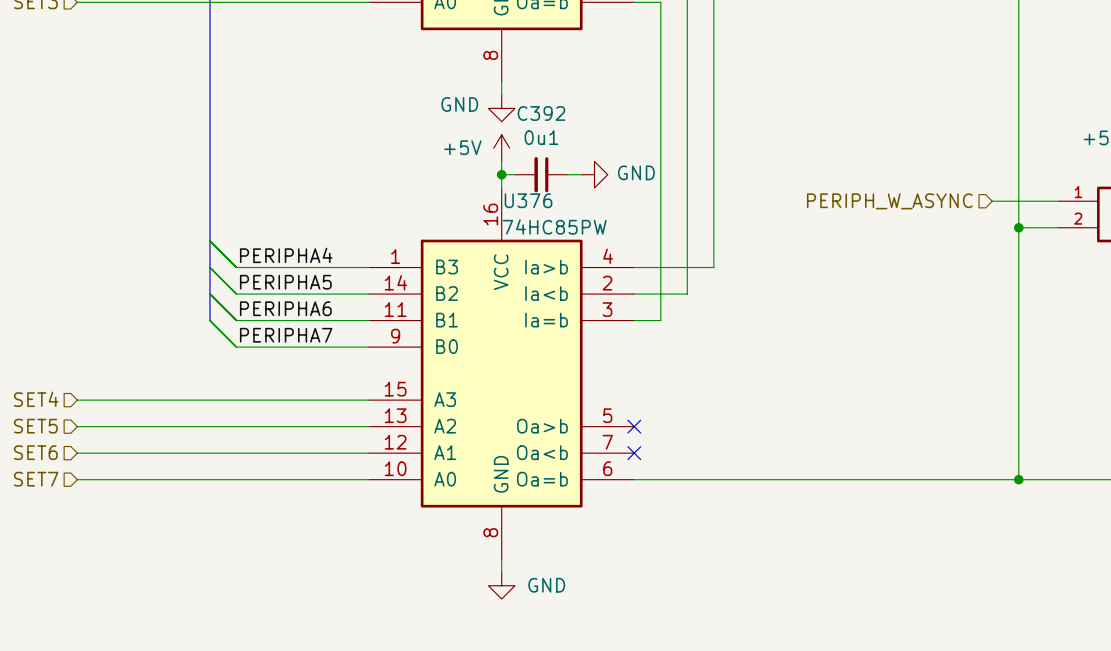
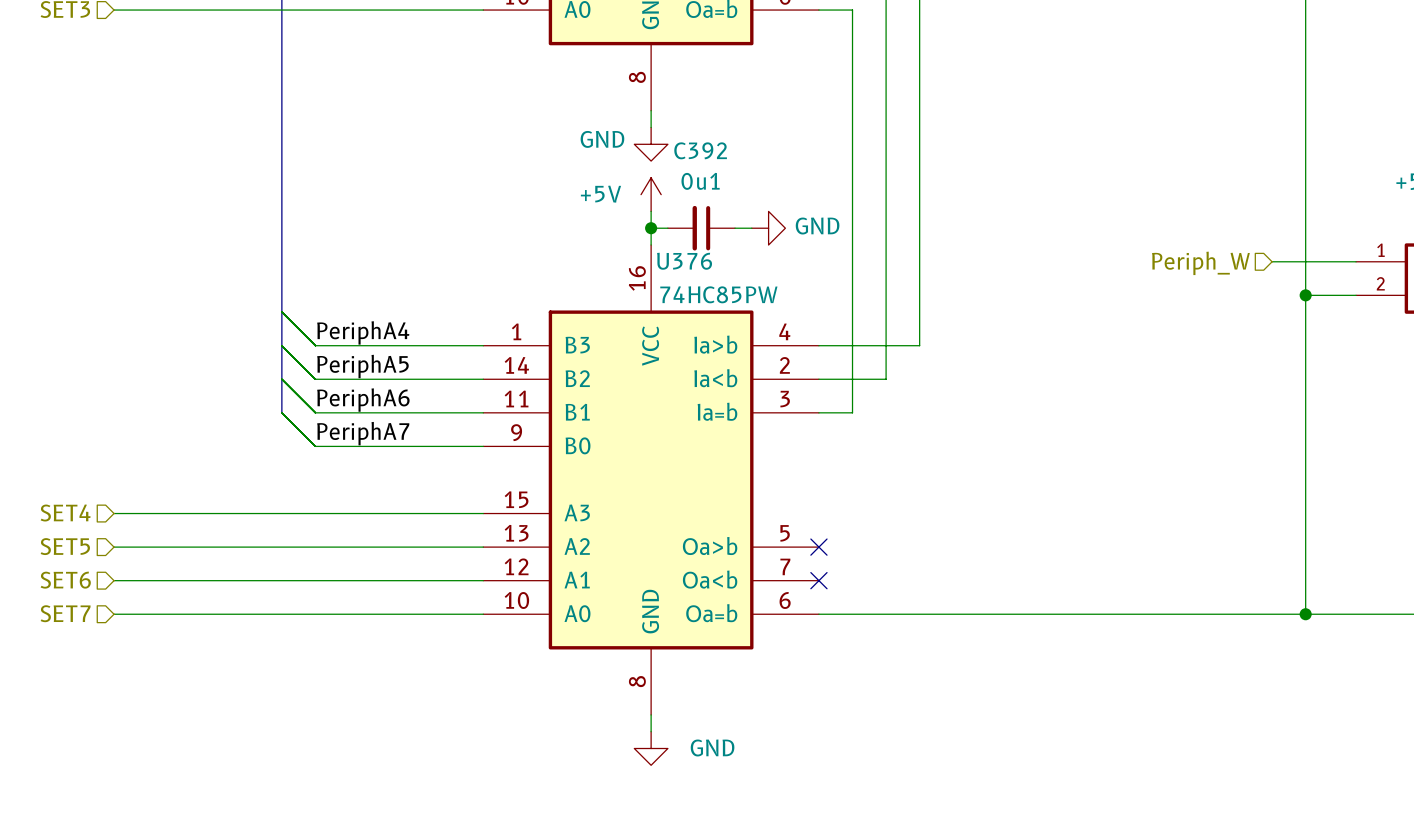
hierarchical label: PERIPH_W_ASYNC (889, 201) -> Periph_W (1200, 263)
label: PERIPHA4 (286, 255) -> PeriphA4 (363, 332)
label: PERIPHA5 (285, 282) -> PeriphA5 (362, 366)
label: PERIPHA6 (285, 308) -> PeriphA6 (363, 400)
label: PERIPHA7 (286, 335) -> PeriphA7 (363, 433)

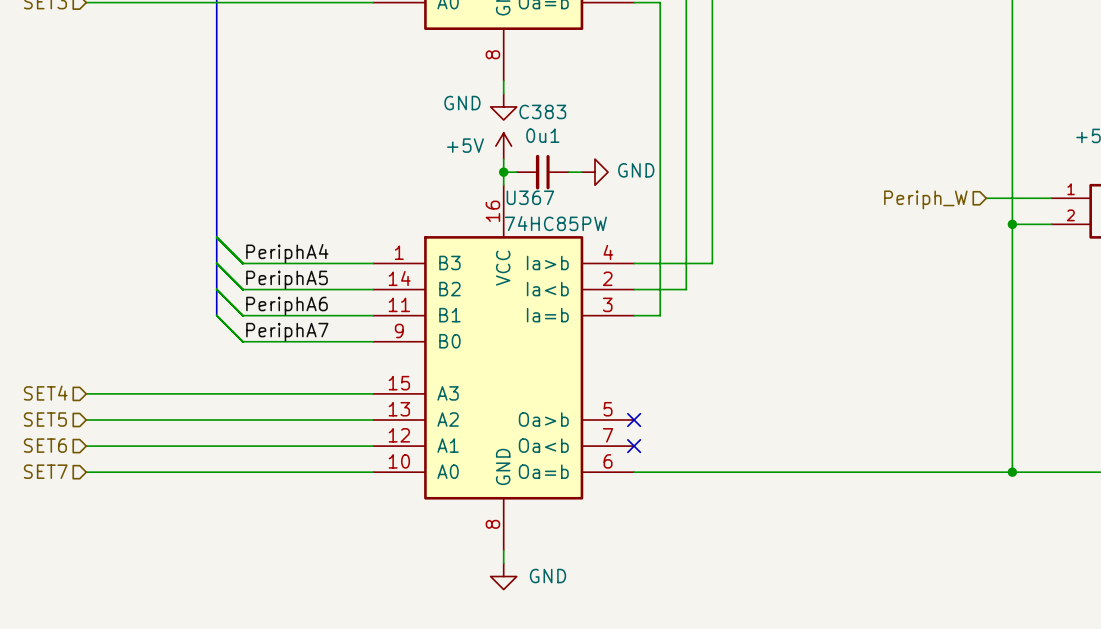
C392 name: C392 (700, 150) -> C383 (542, 111)
U376 name: U376 (684, 261) -> U367 (530, 197)

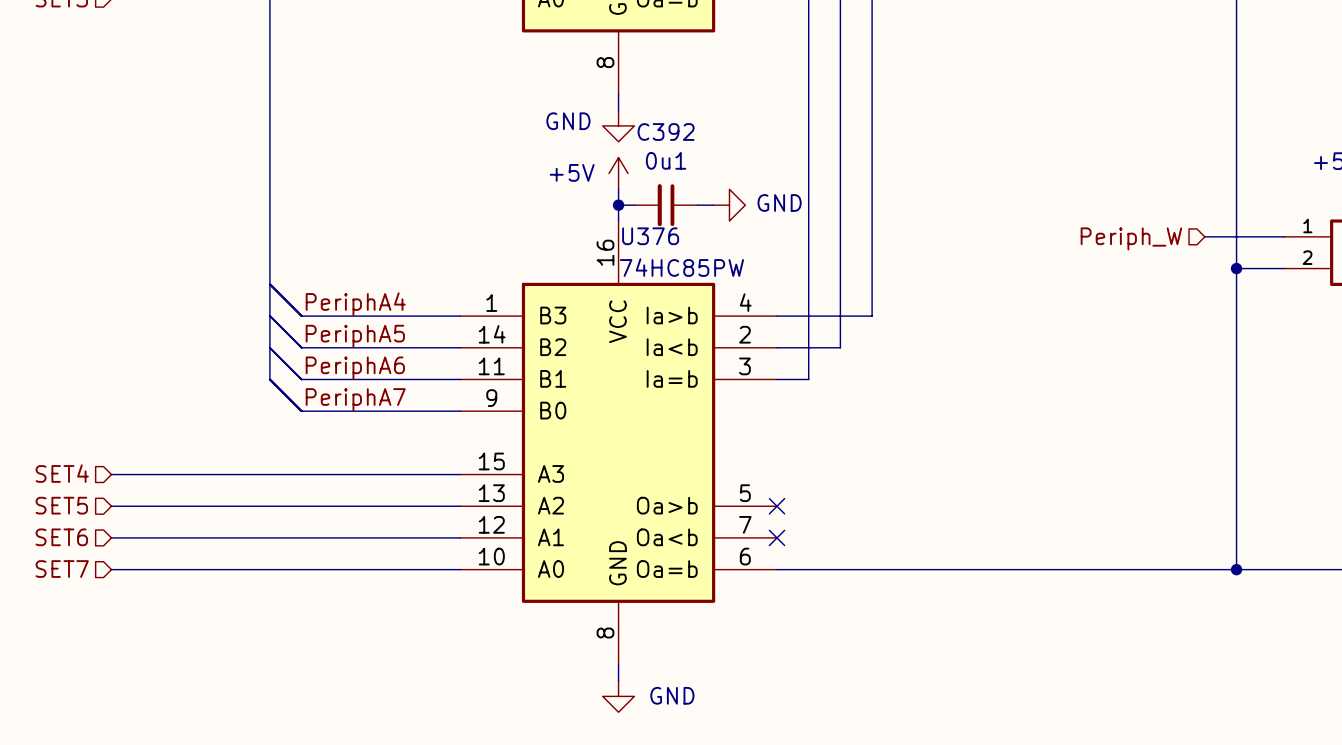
C383 name: C383 (542, 111) -> C392 (666, 132)
U367 name: U367 (530, 197) -> U376 (650, 236)

